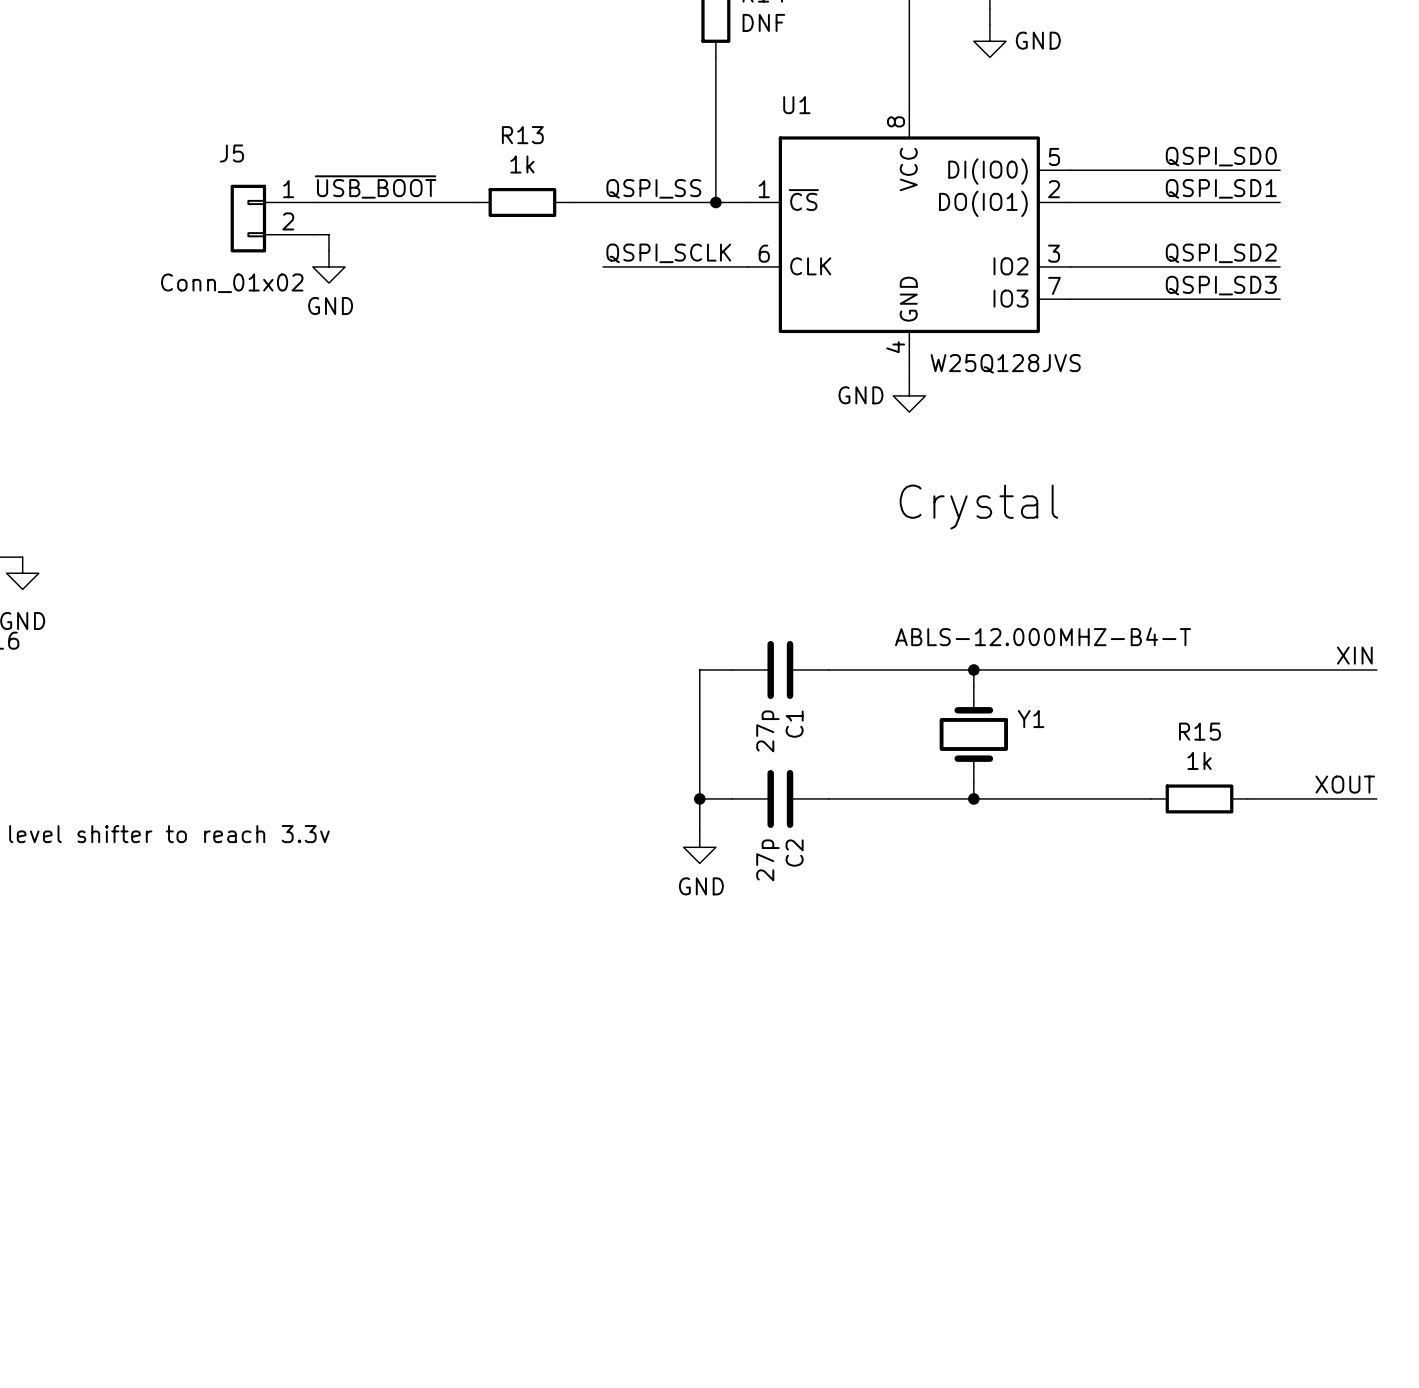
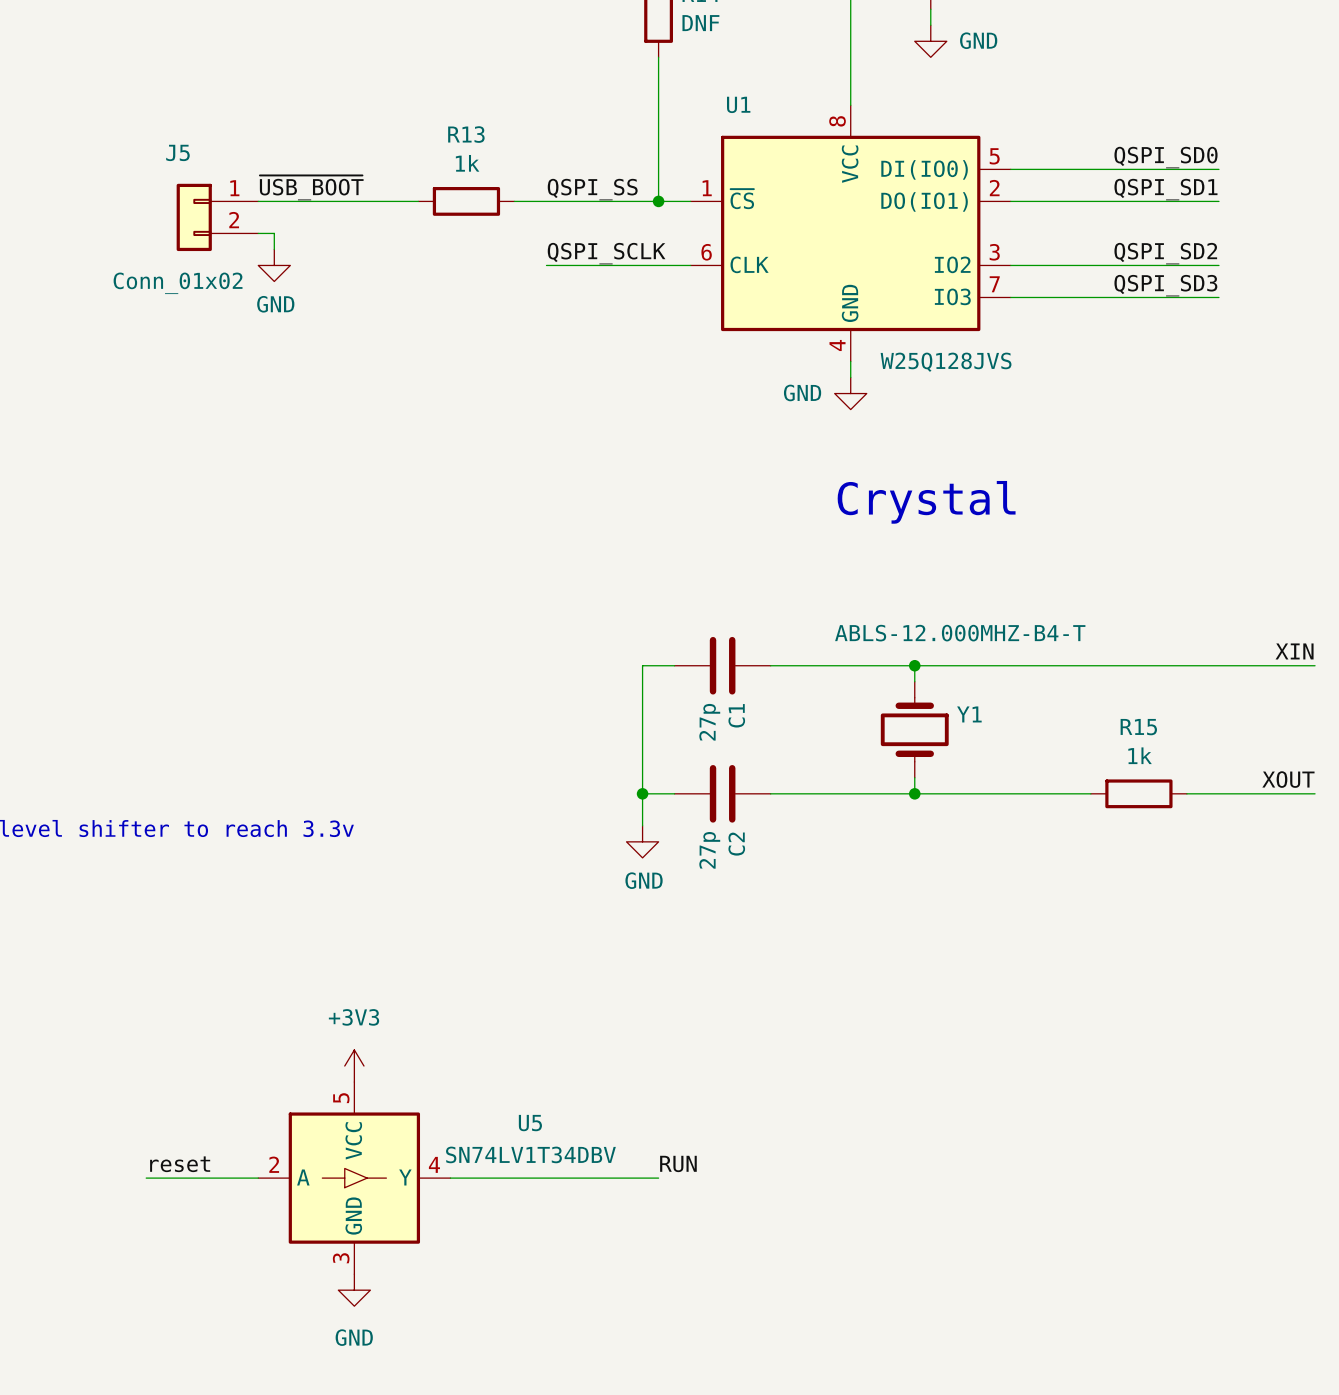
power symbol: none -> +3V3 (354, 1066)
label: none -> reset (180, 1164)
label: none -> RUN (678, 1163)
wire: none -> (146, 1178) (258, 1178)
U5: none -> SN74LV1T34DBV (354, 1178)
wire: none -> (450, 1178) (658, 1178)
power symbol: none -> GND (354, 1290)

